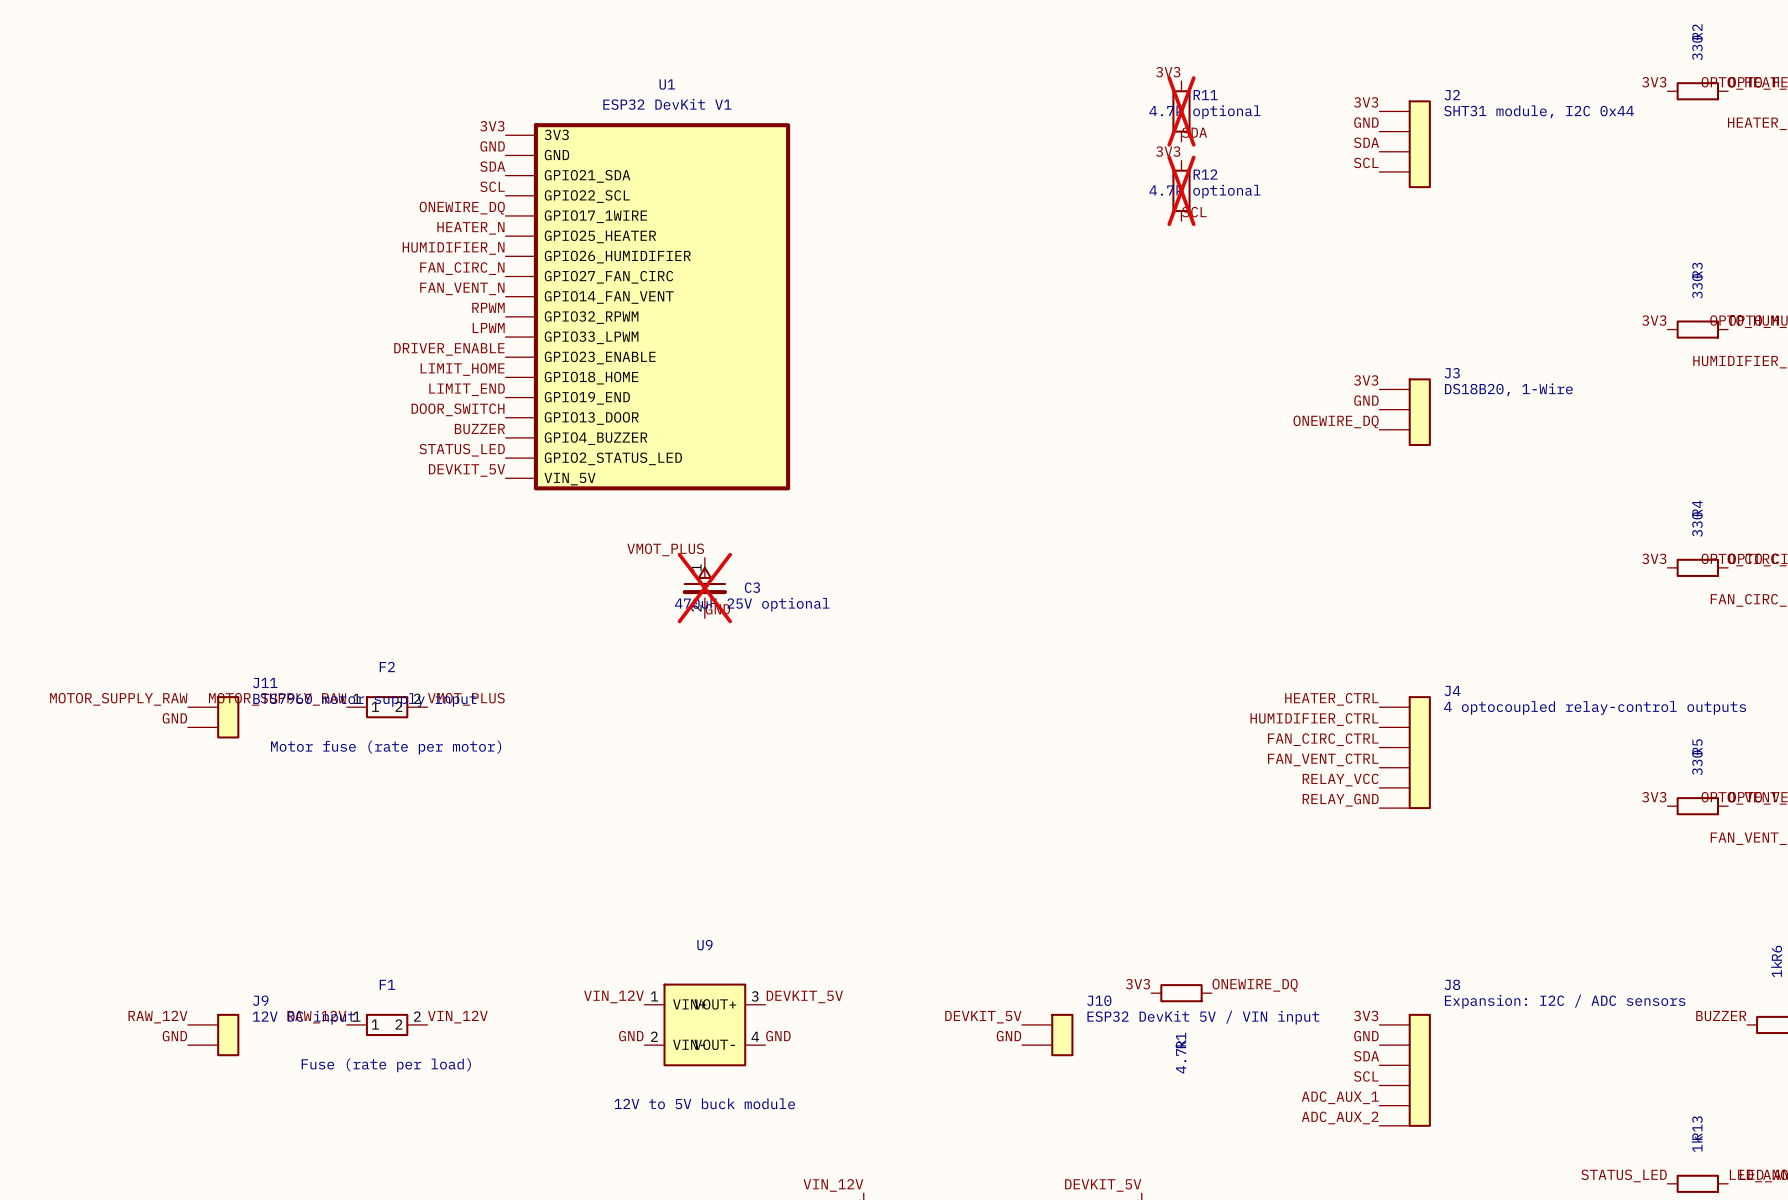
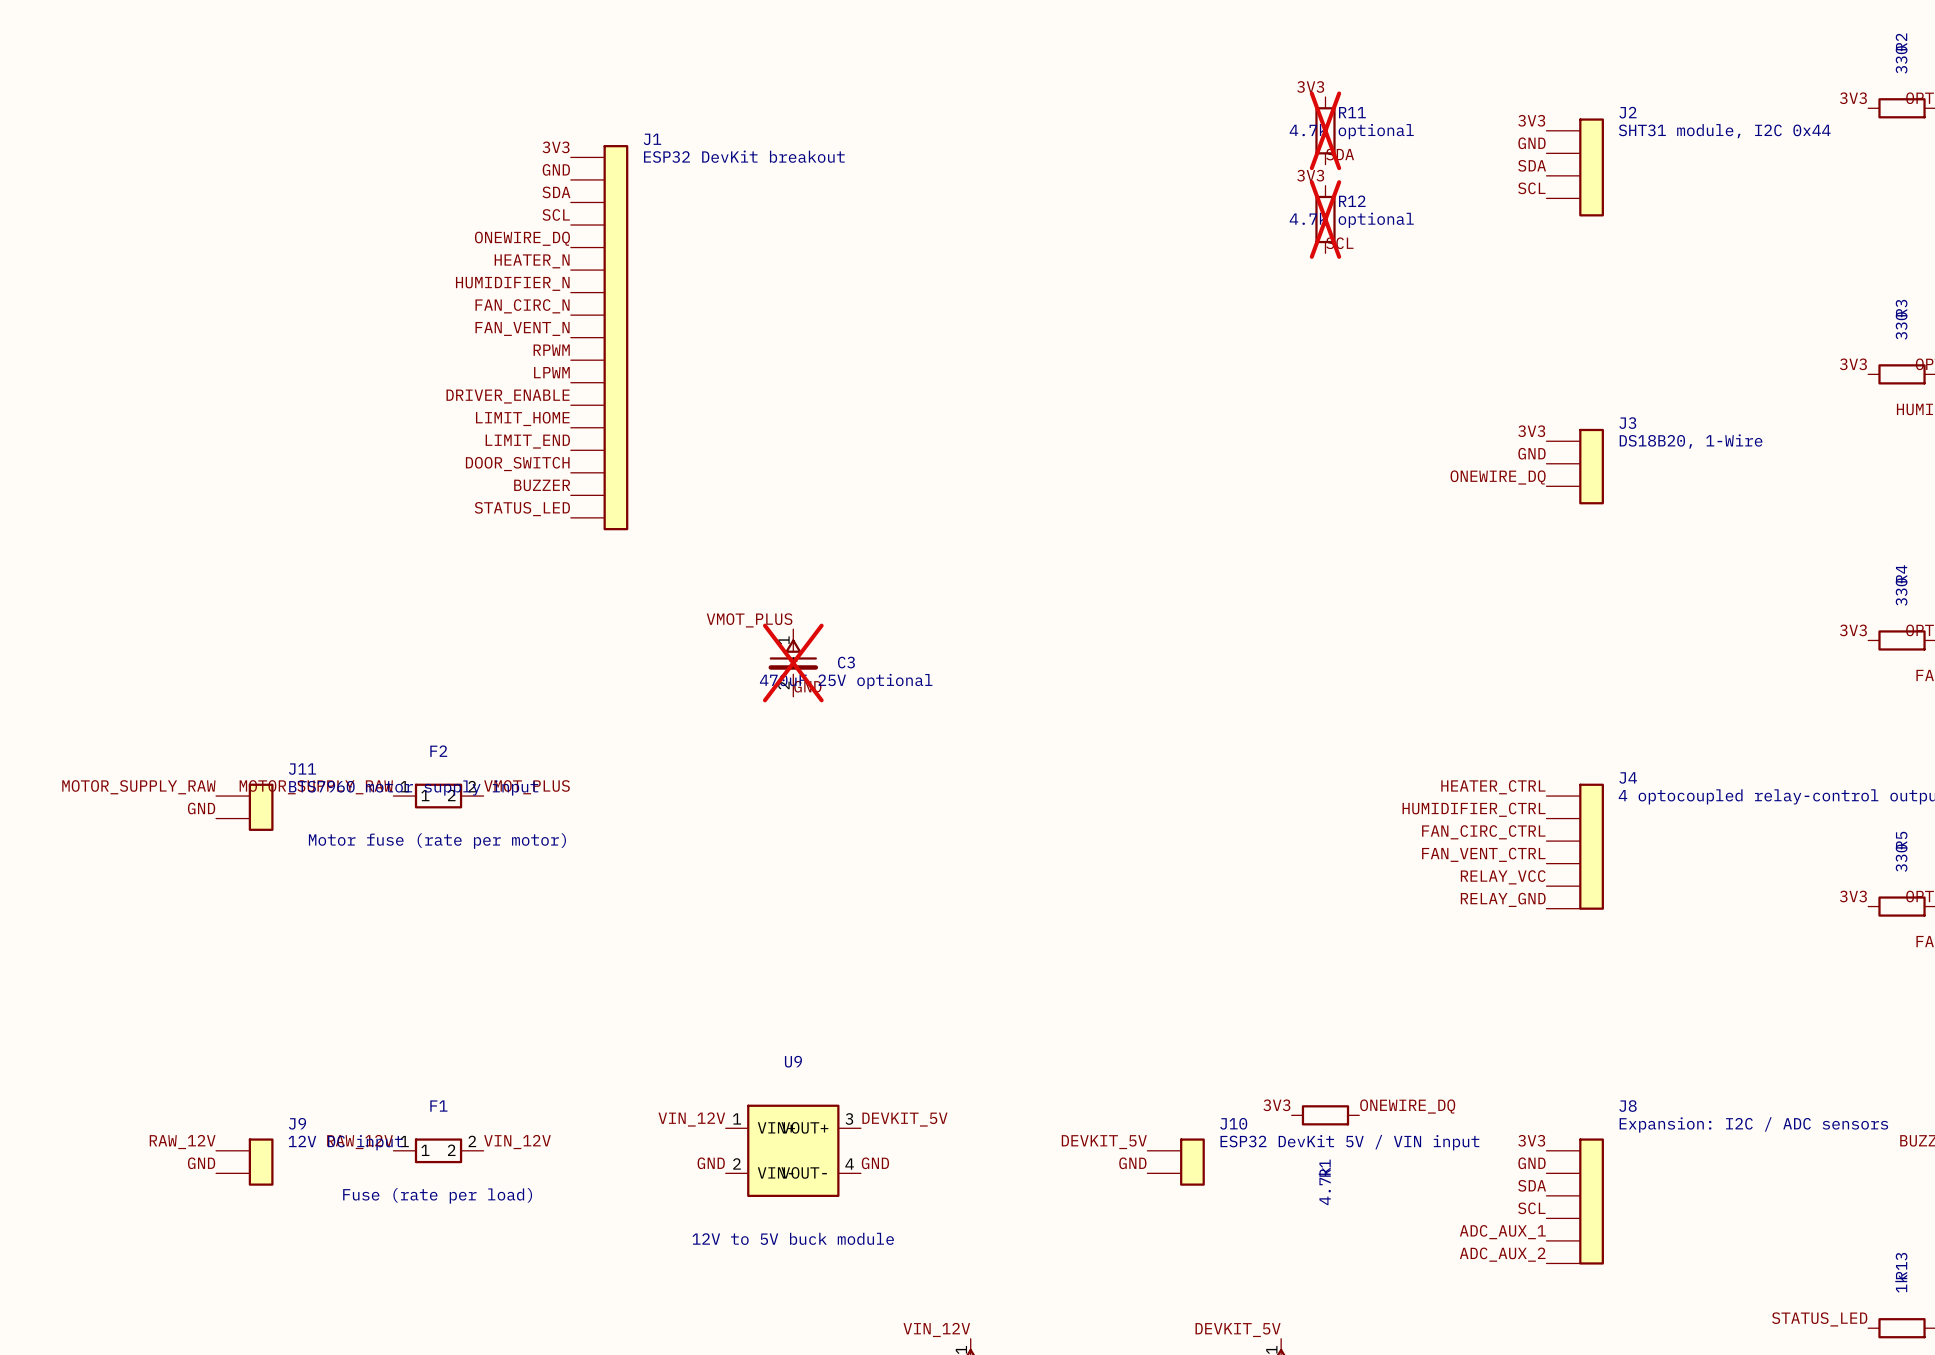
J1: none -> ESP32 DevKit breakout (599, 337)
U1: ESP32 DevKit V1 (647, 306) -> none
label: DEVKIT_5V (467, 470) -> none

